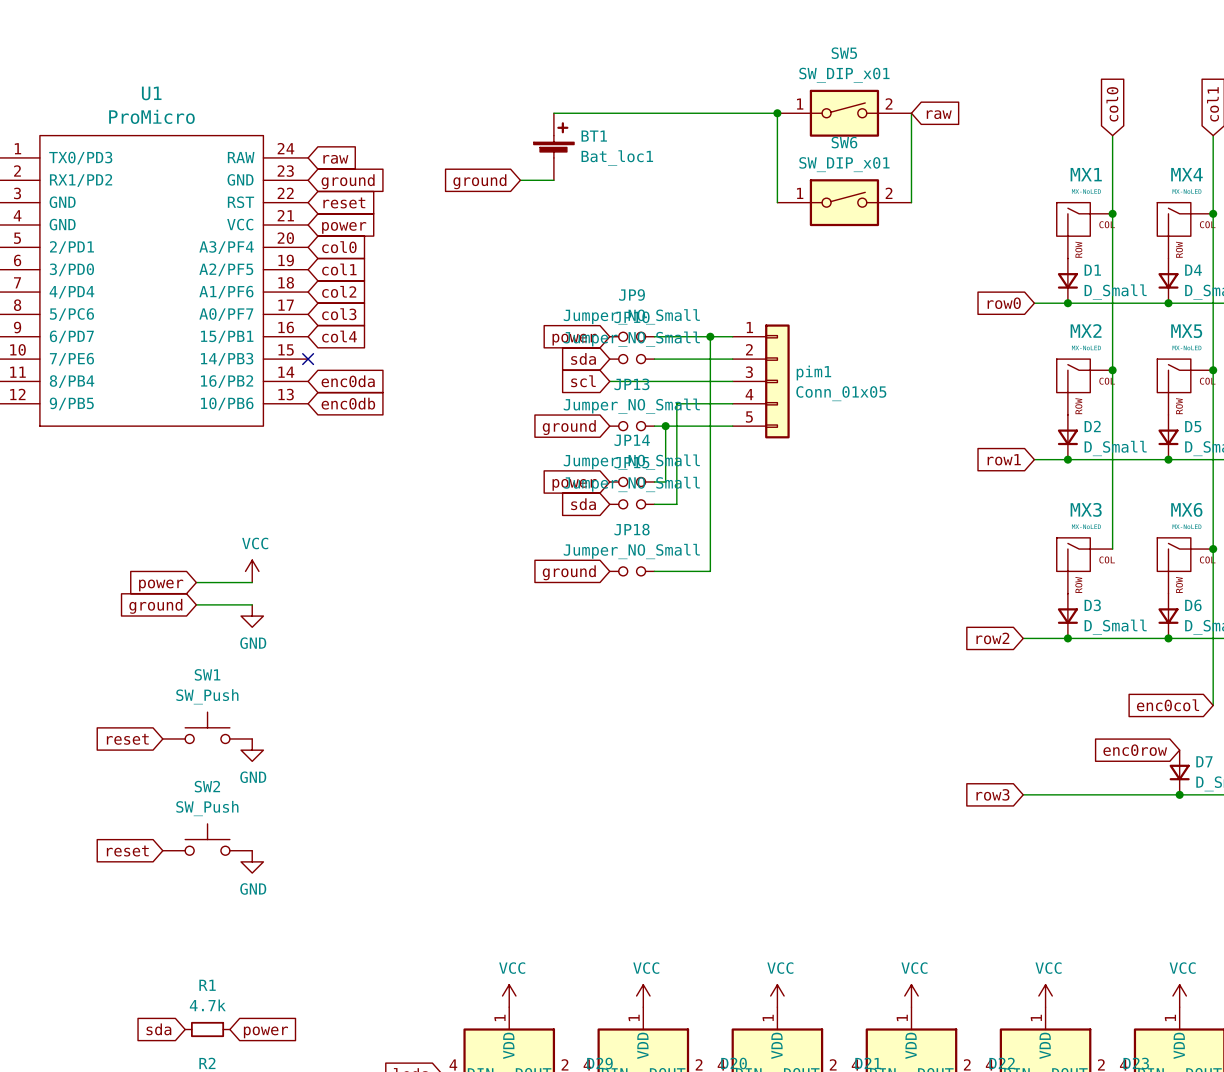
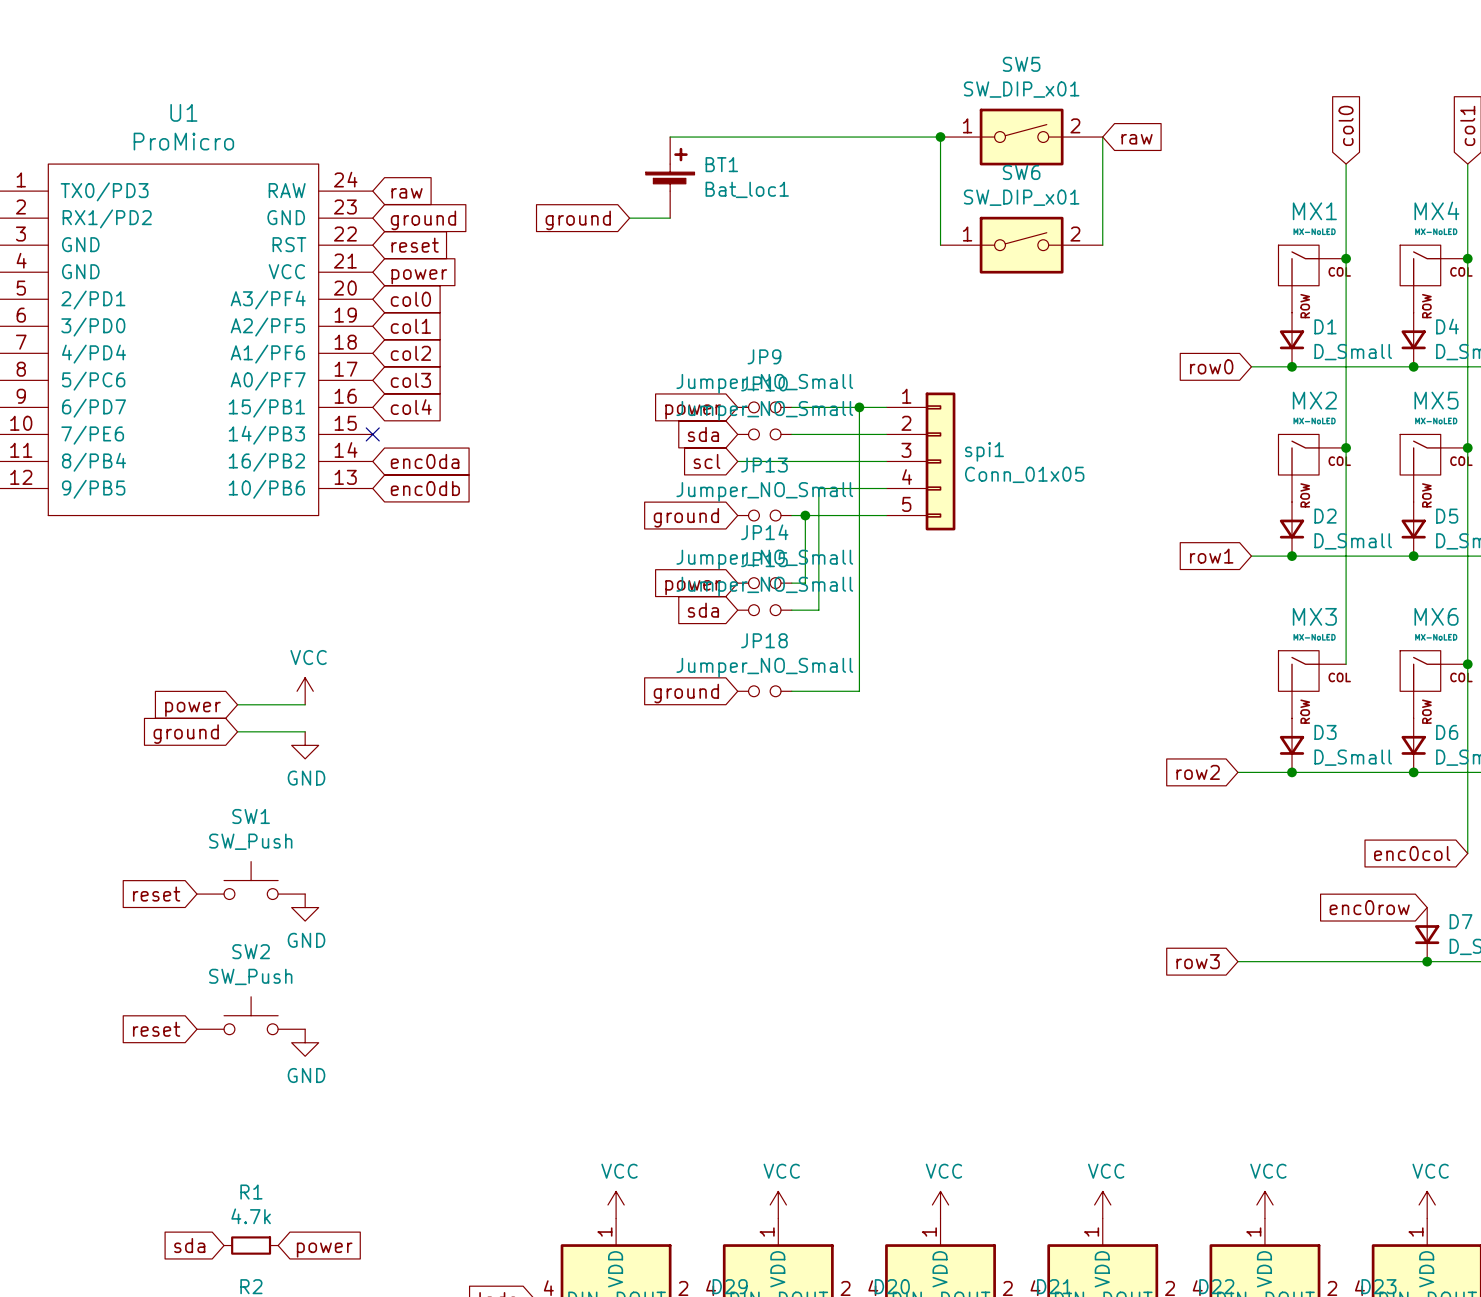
pim1 name: pim1 (813, 372) -> spi1 (984, 451)

